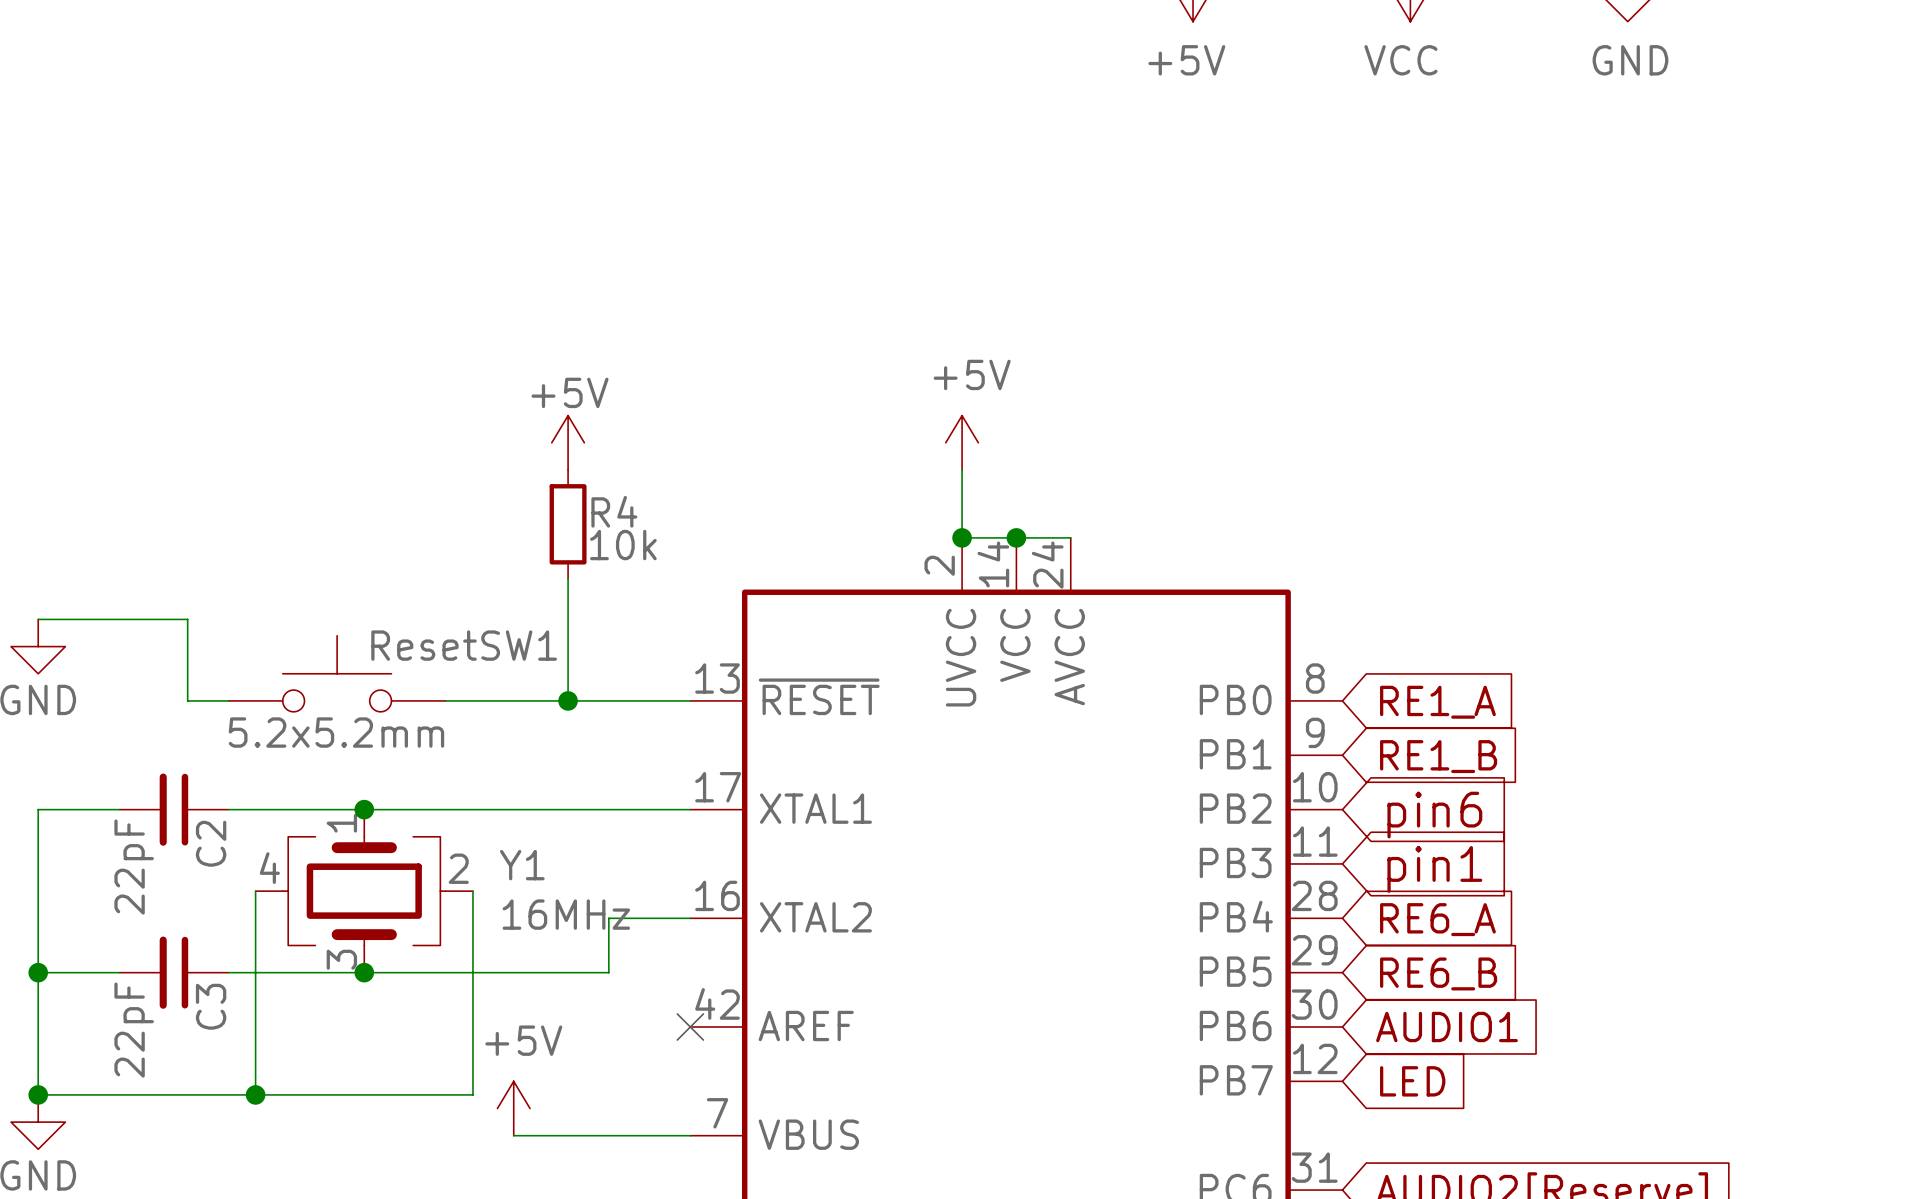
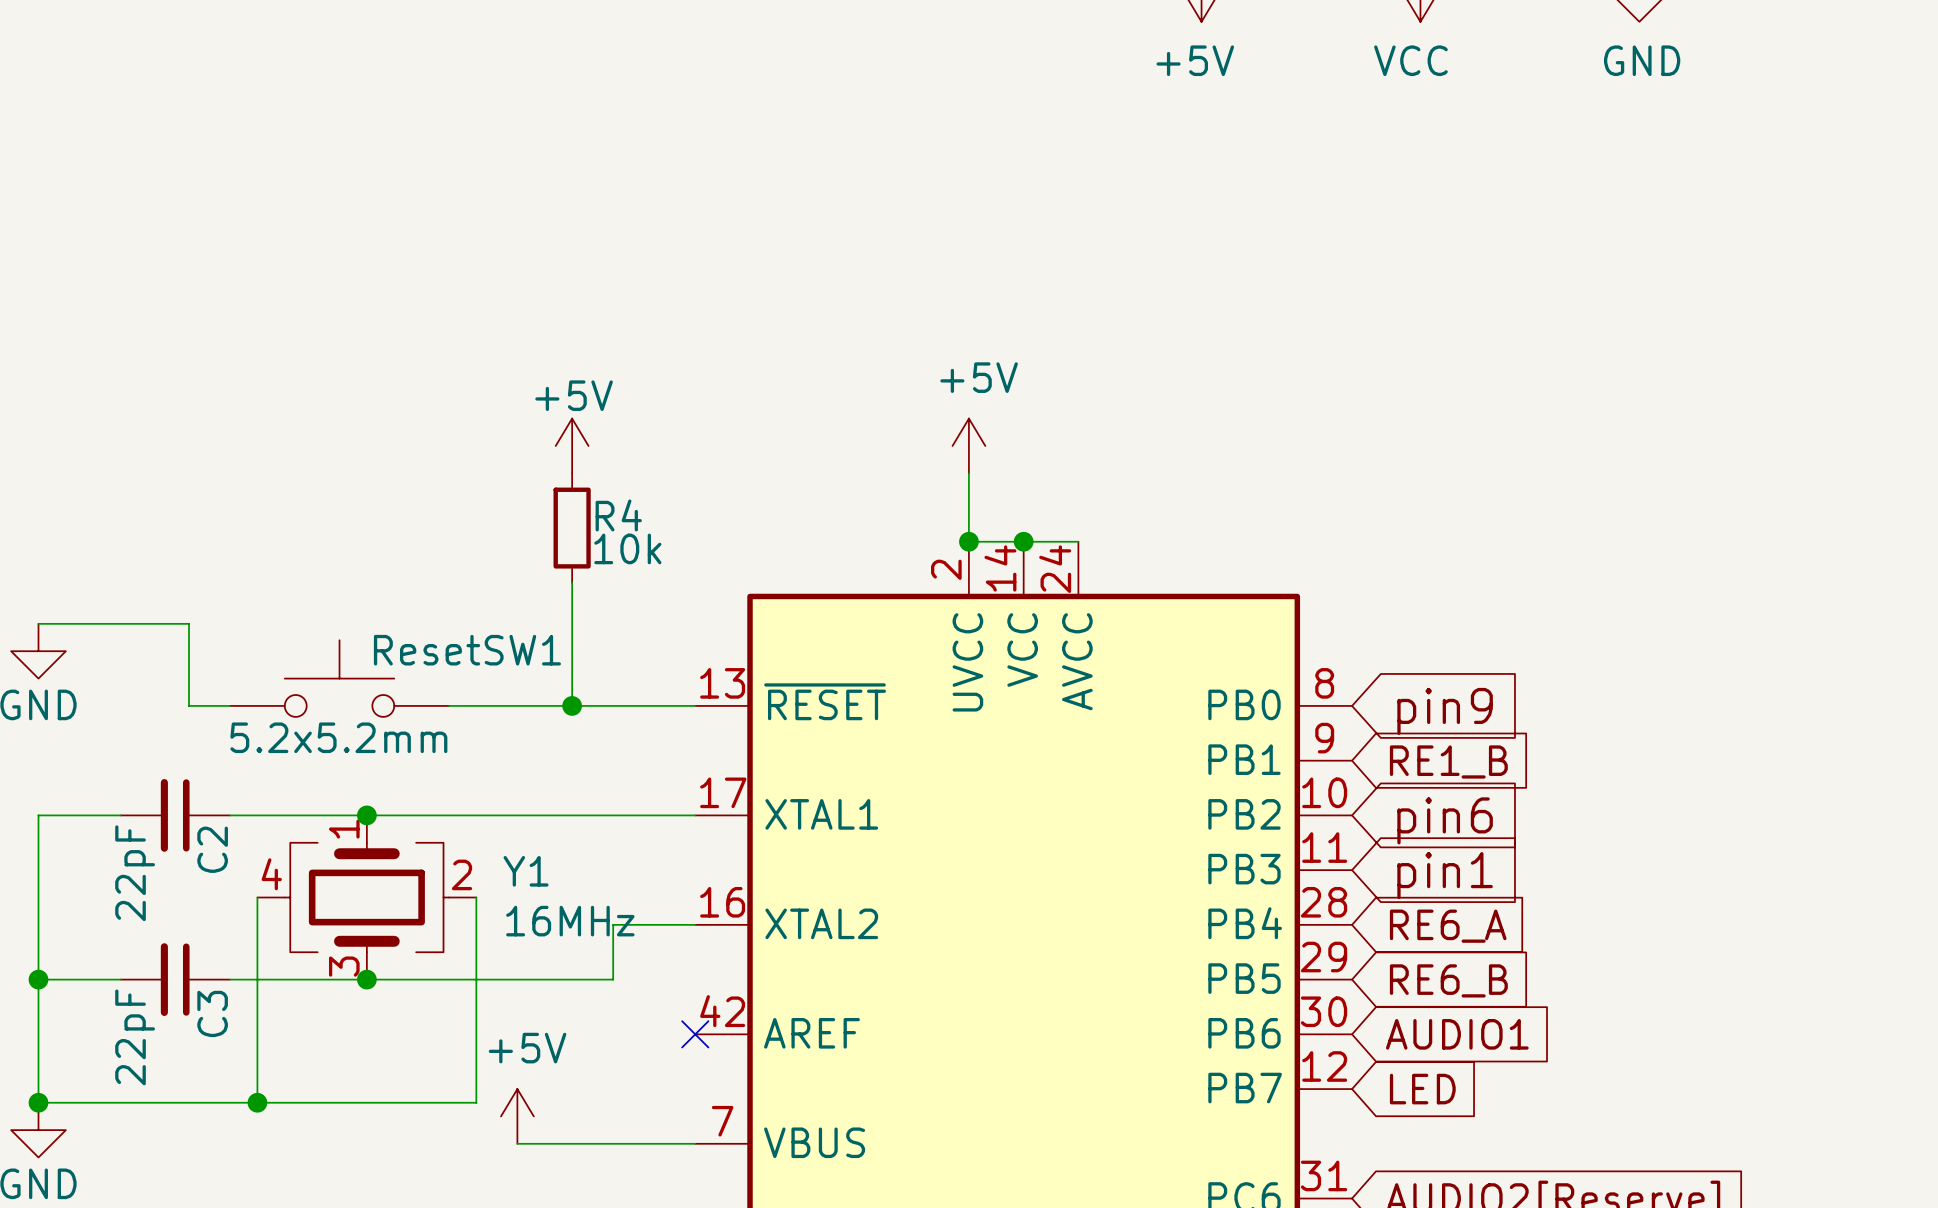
global label: RE1_A (1437, 702) -> pin9 (1445, 711)

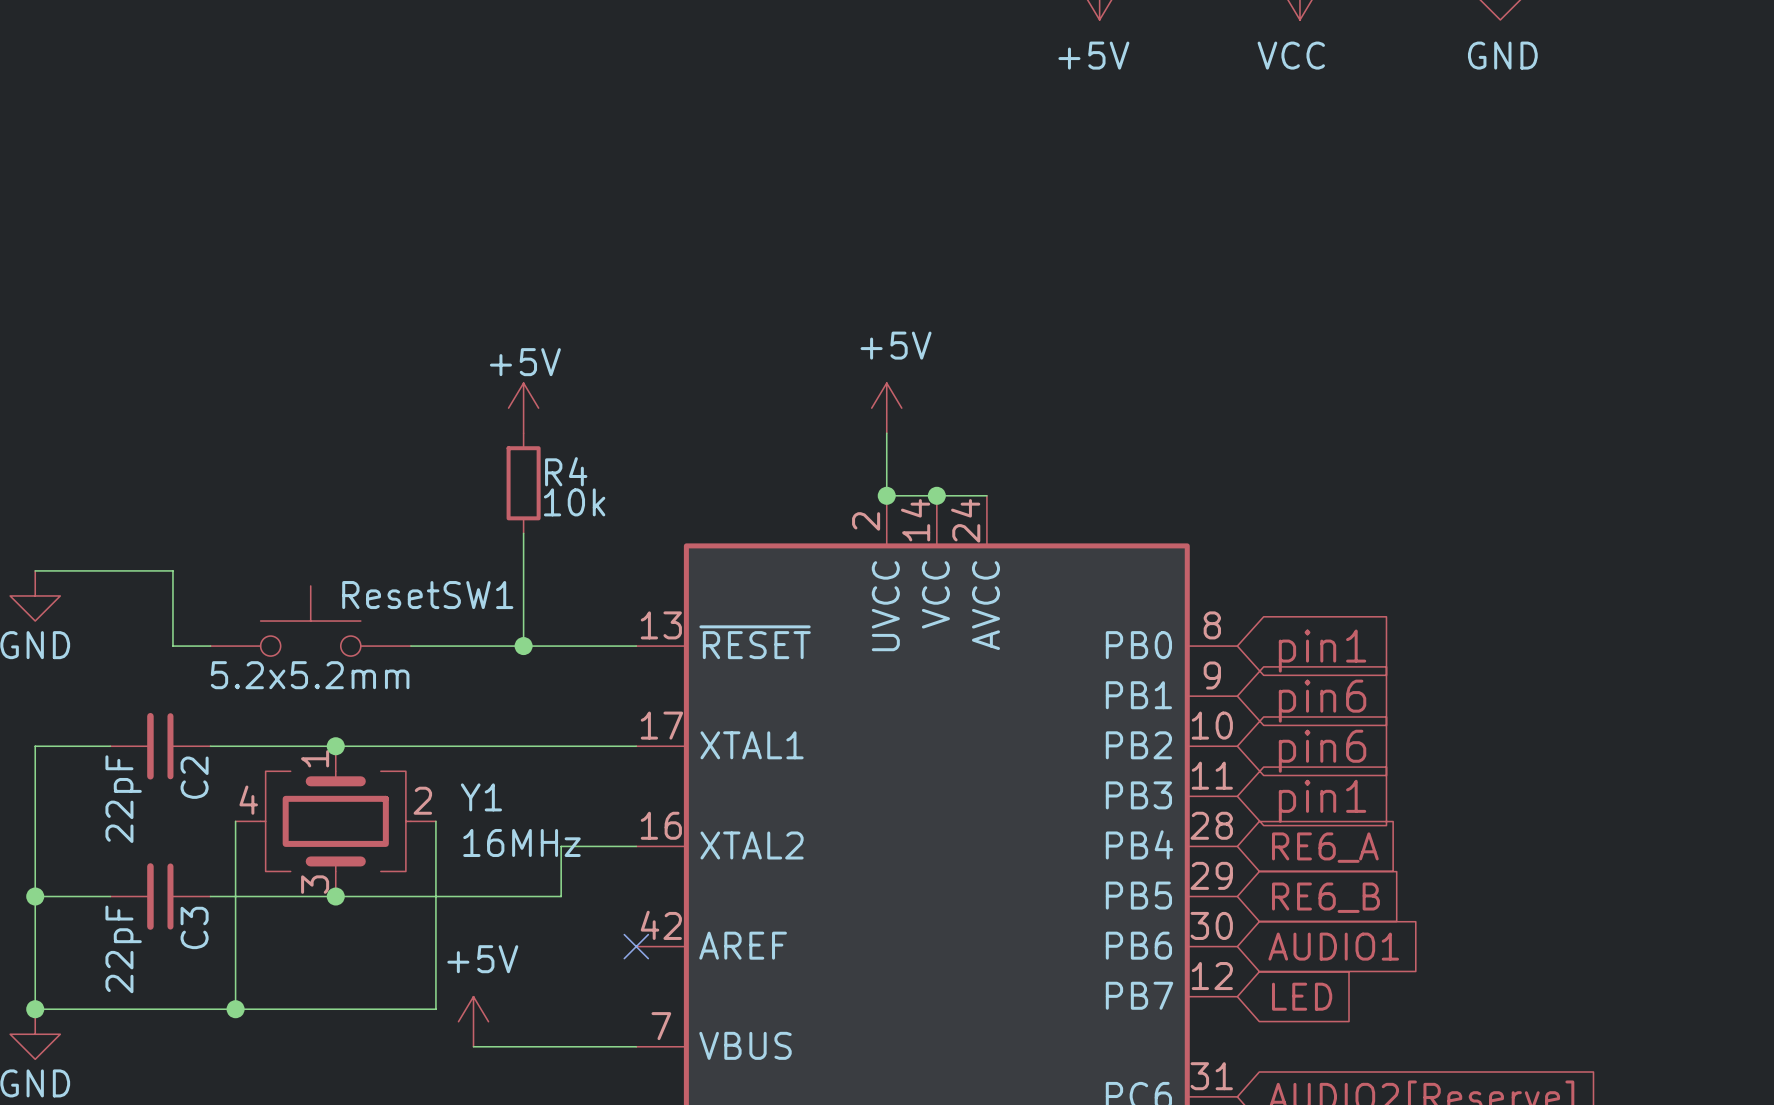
global label: pin9 (1445, 711) -> pin1 (1322, 651)
global label: RE1_B (1448, 761) -> pin6 (1322, 701)

